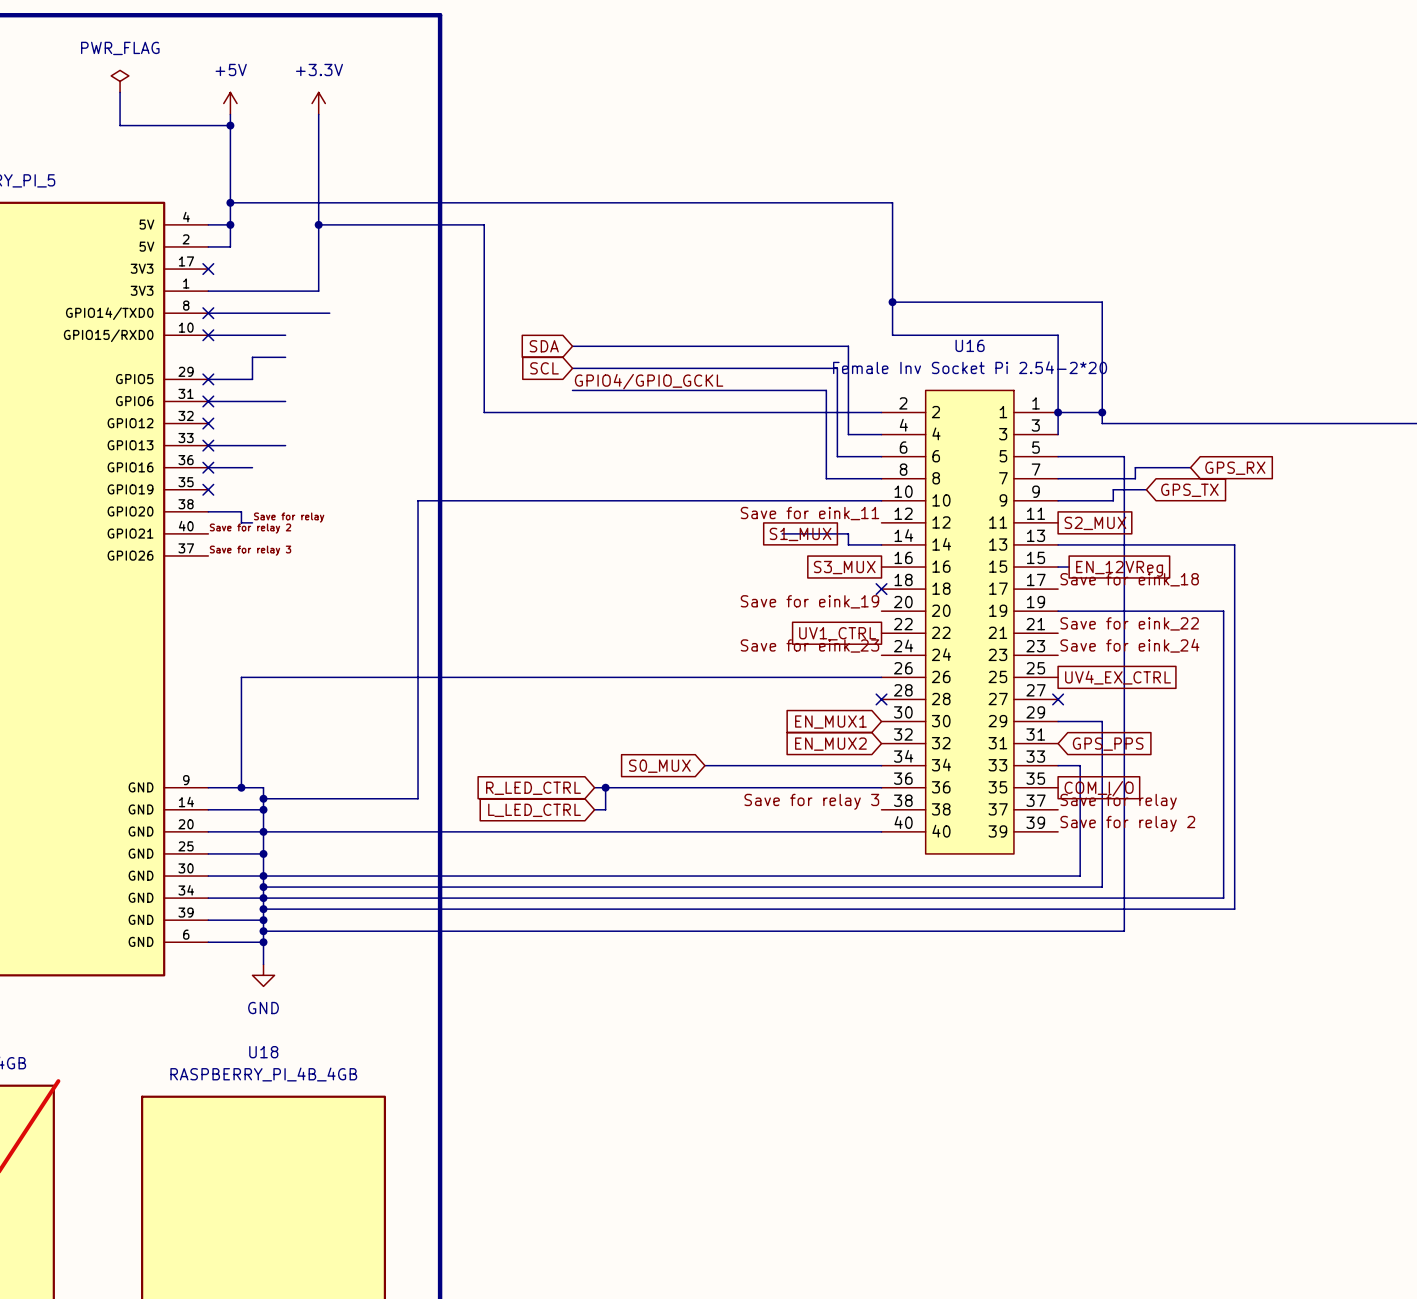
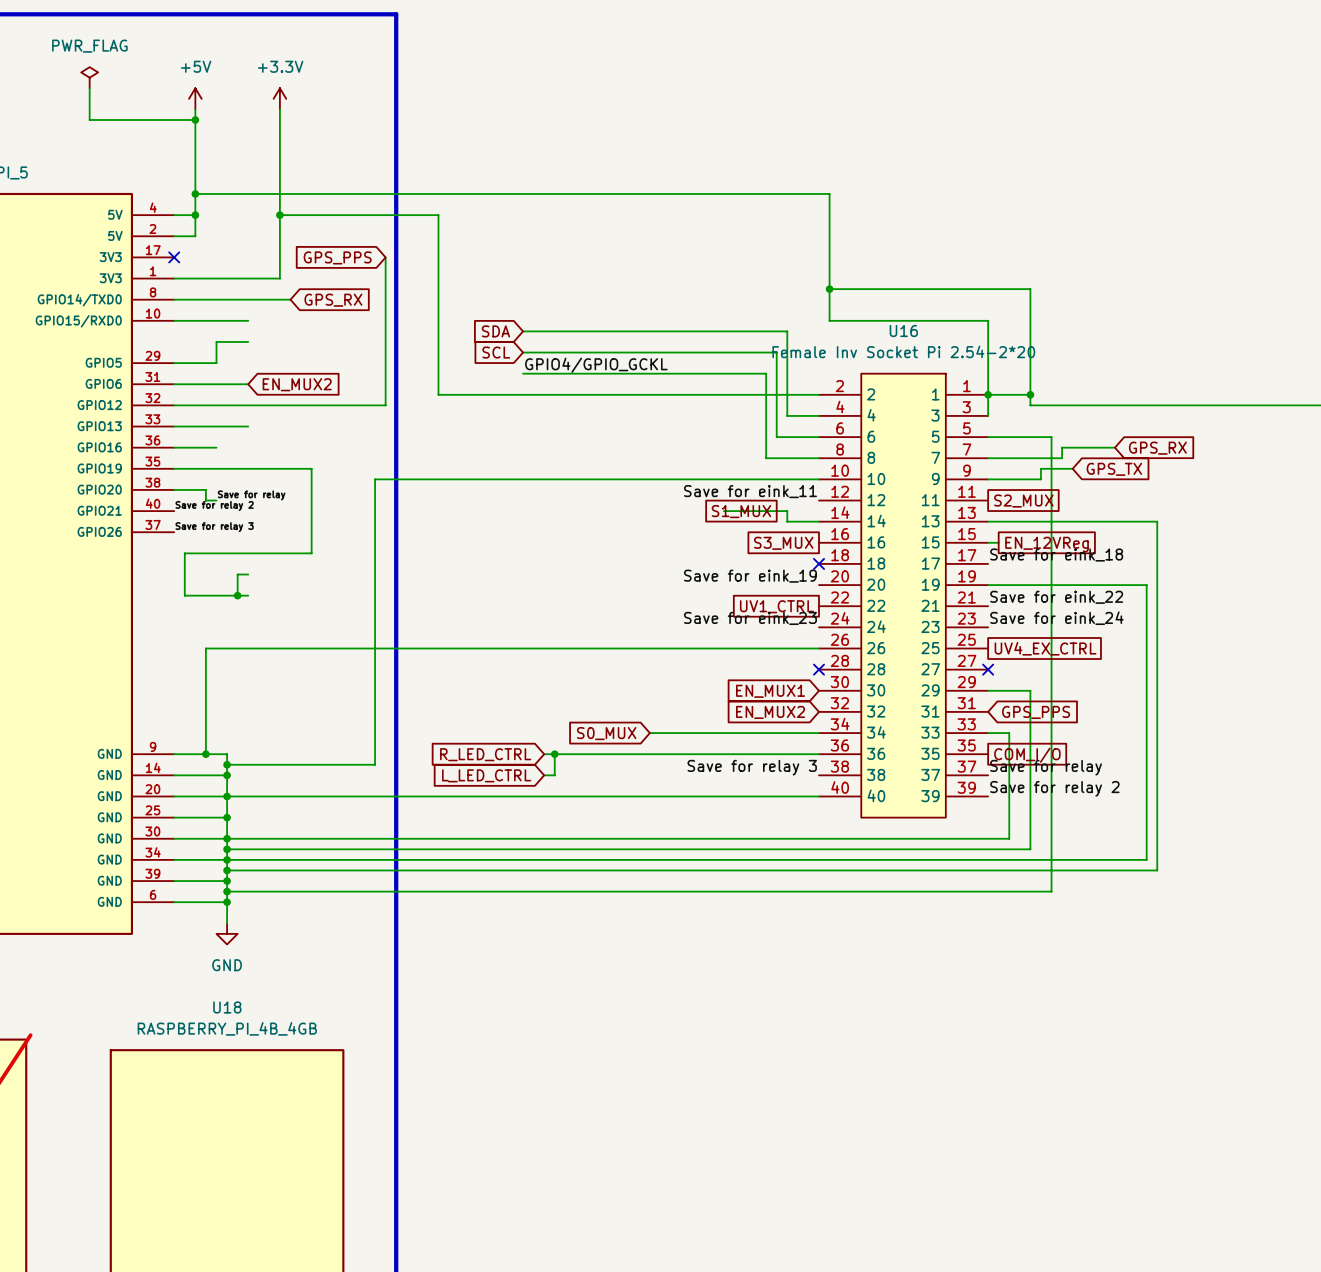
global label: none -> GPS_PPS (337, 257)
wire: none -> (385, 257) (385, 405) (174, 405)
no-connect mark: (208, 313) -> none
global label: none -> GPS_RX (333, 300)
no-connect mark: (208, 335) -> none
no-connect mark: (208, 379) -> none
no-connect mark: (208, 401) -> none
global label: none -> EN_MUX2 (297, 384)
no-connect mark: (208, 423) -> none
no-connect mark: (208, 445) -> none
no-connect mark: (208, 467) -> none
wire: none -> (174, 468) (311, 468) (311, 553) (184, 553) (184, 595) (248, 595)
no-connect mark: (208, 489) -> none
wire: none -> (248, 574) (237, 574) (237, 595)
junction: none -> (237, 595)

